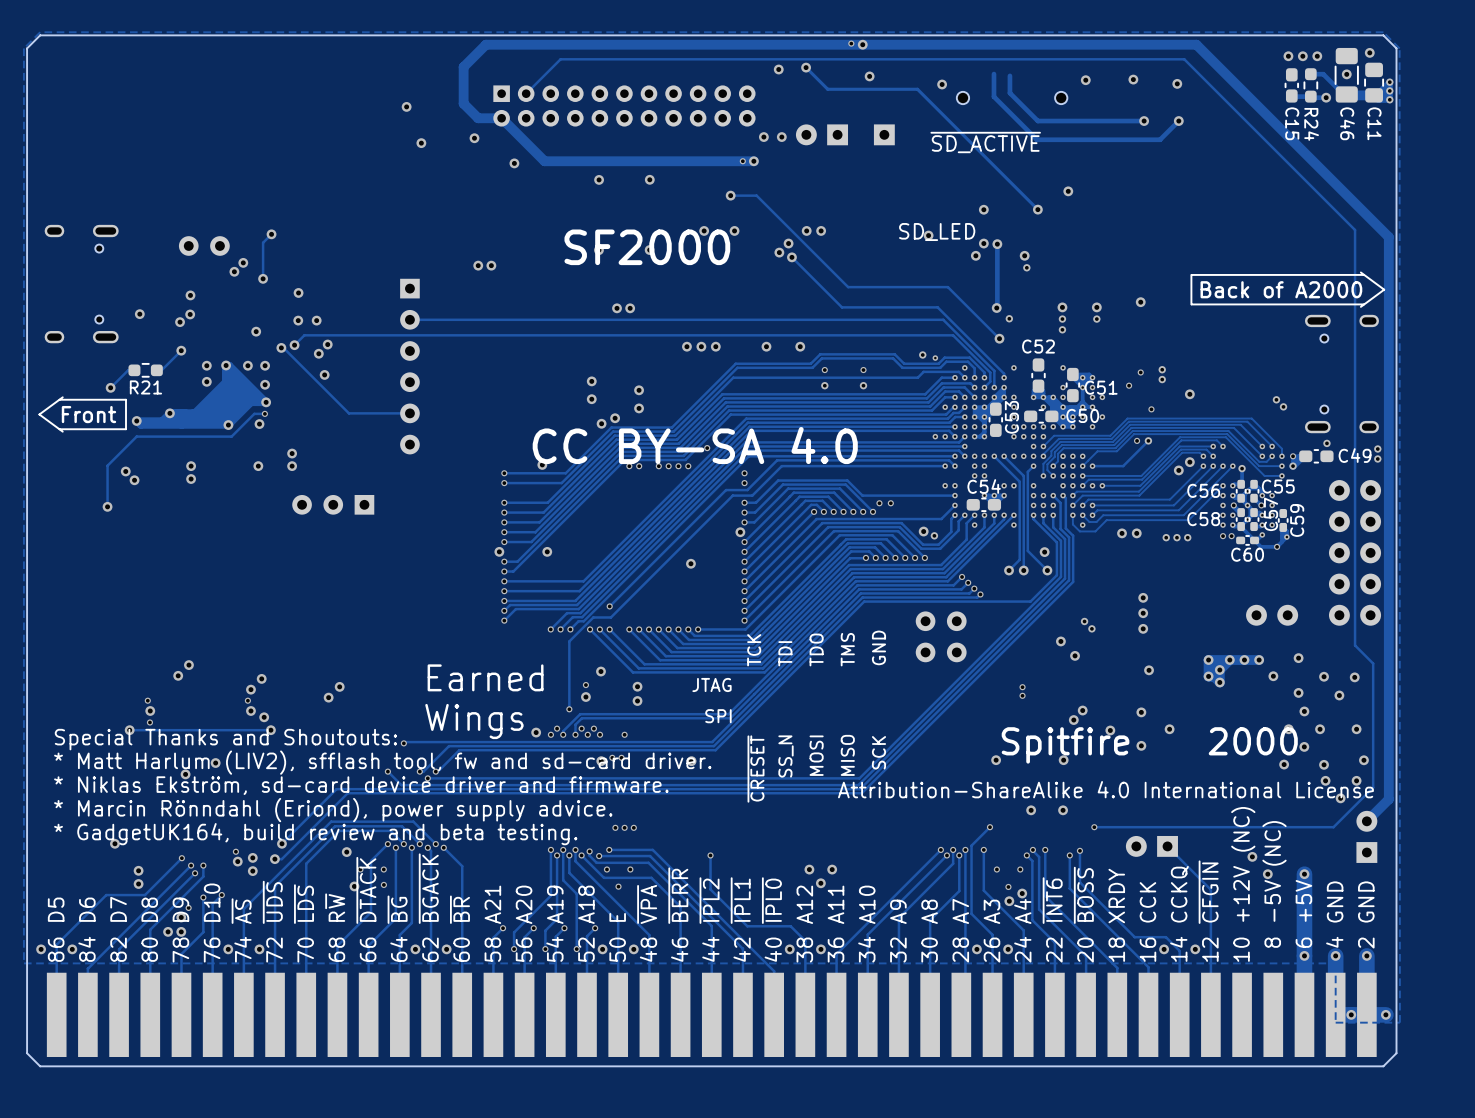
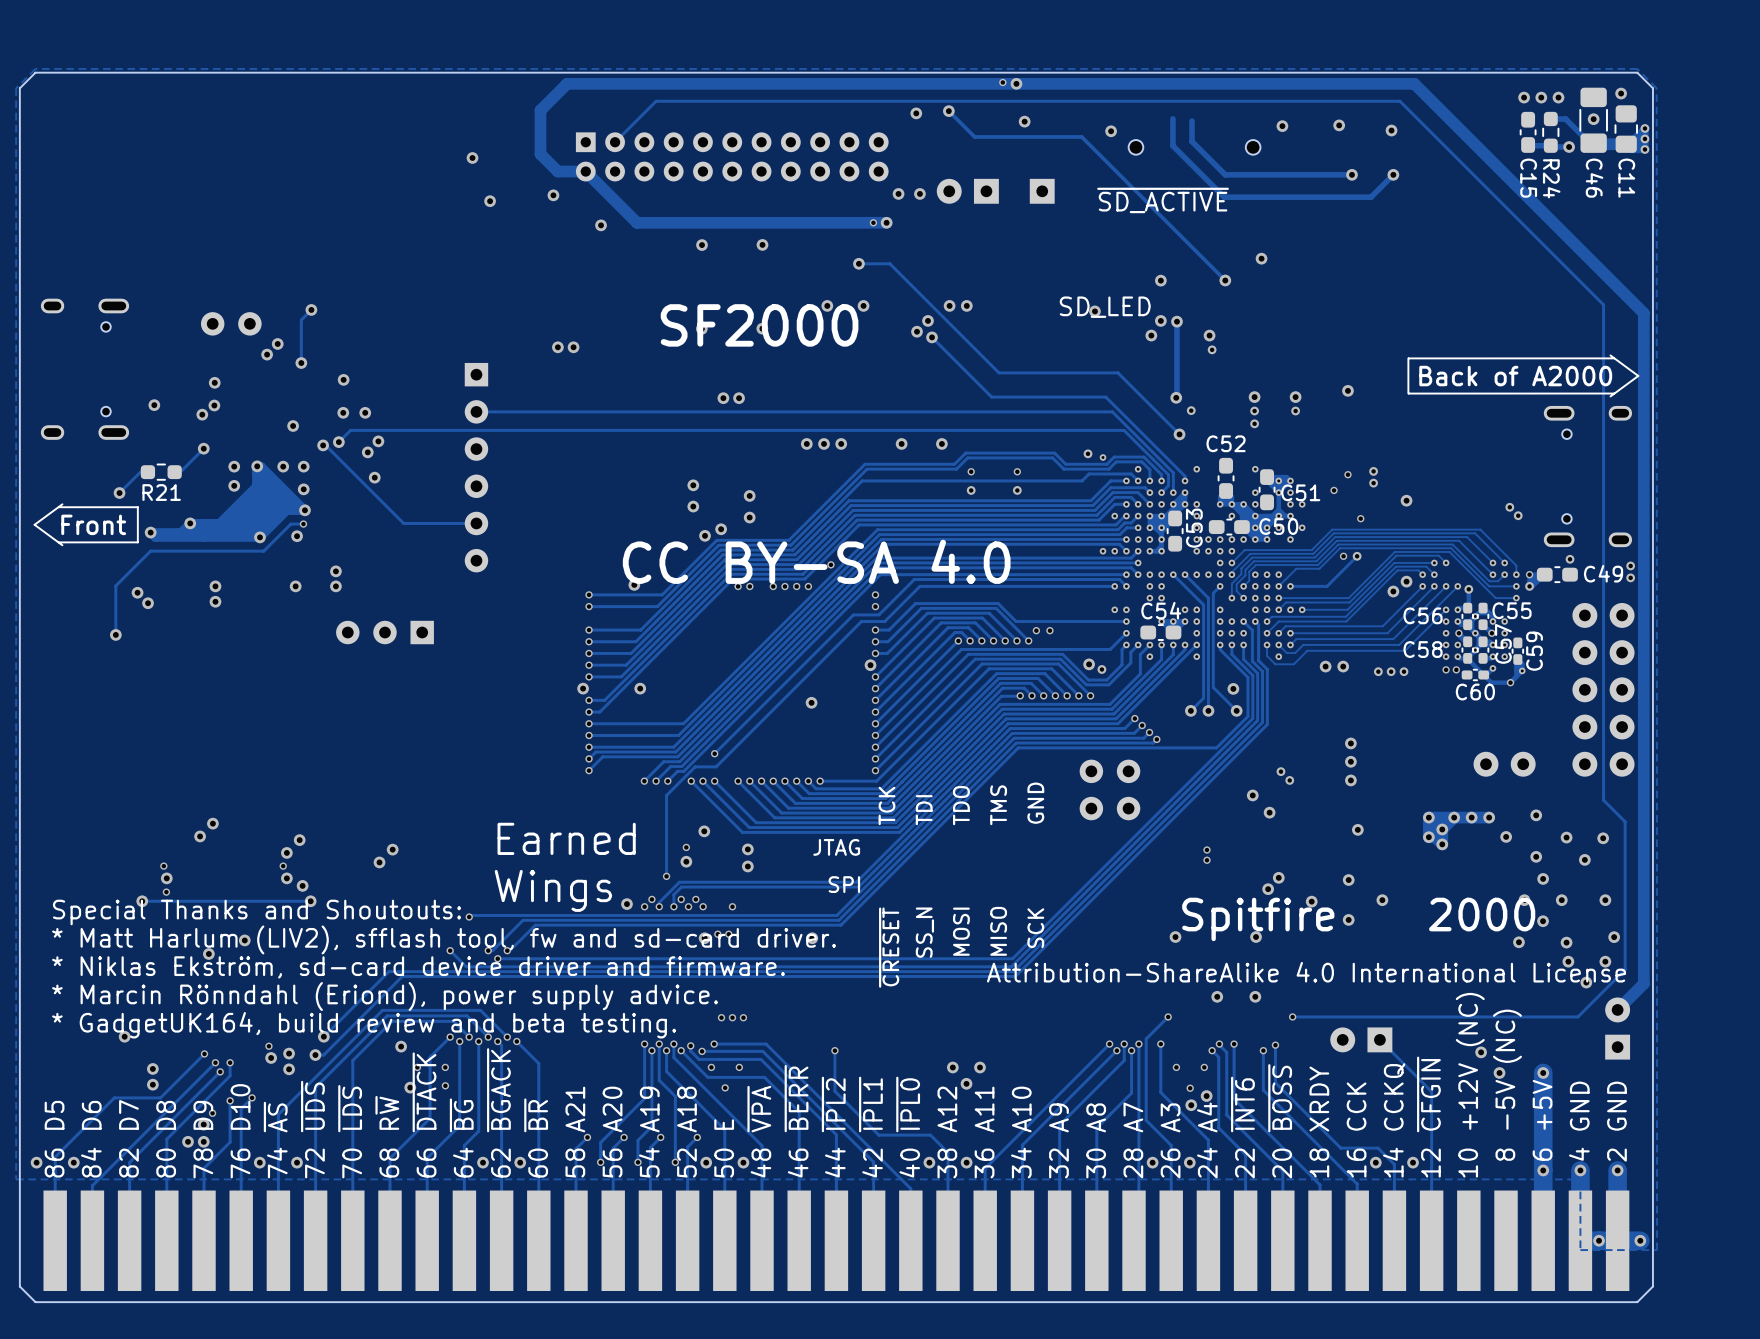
via: none -> (1196, 621)
via: none -> (1196, 633)

